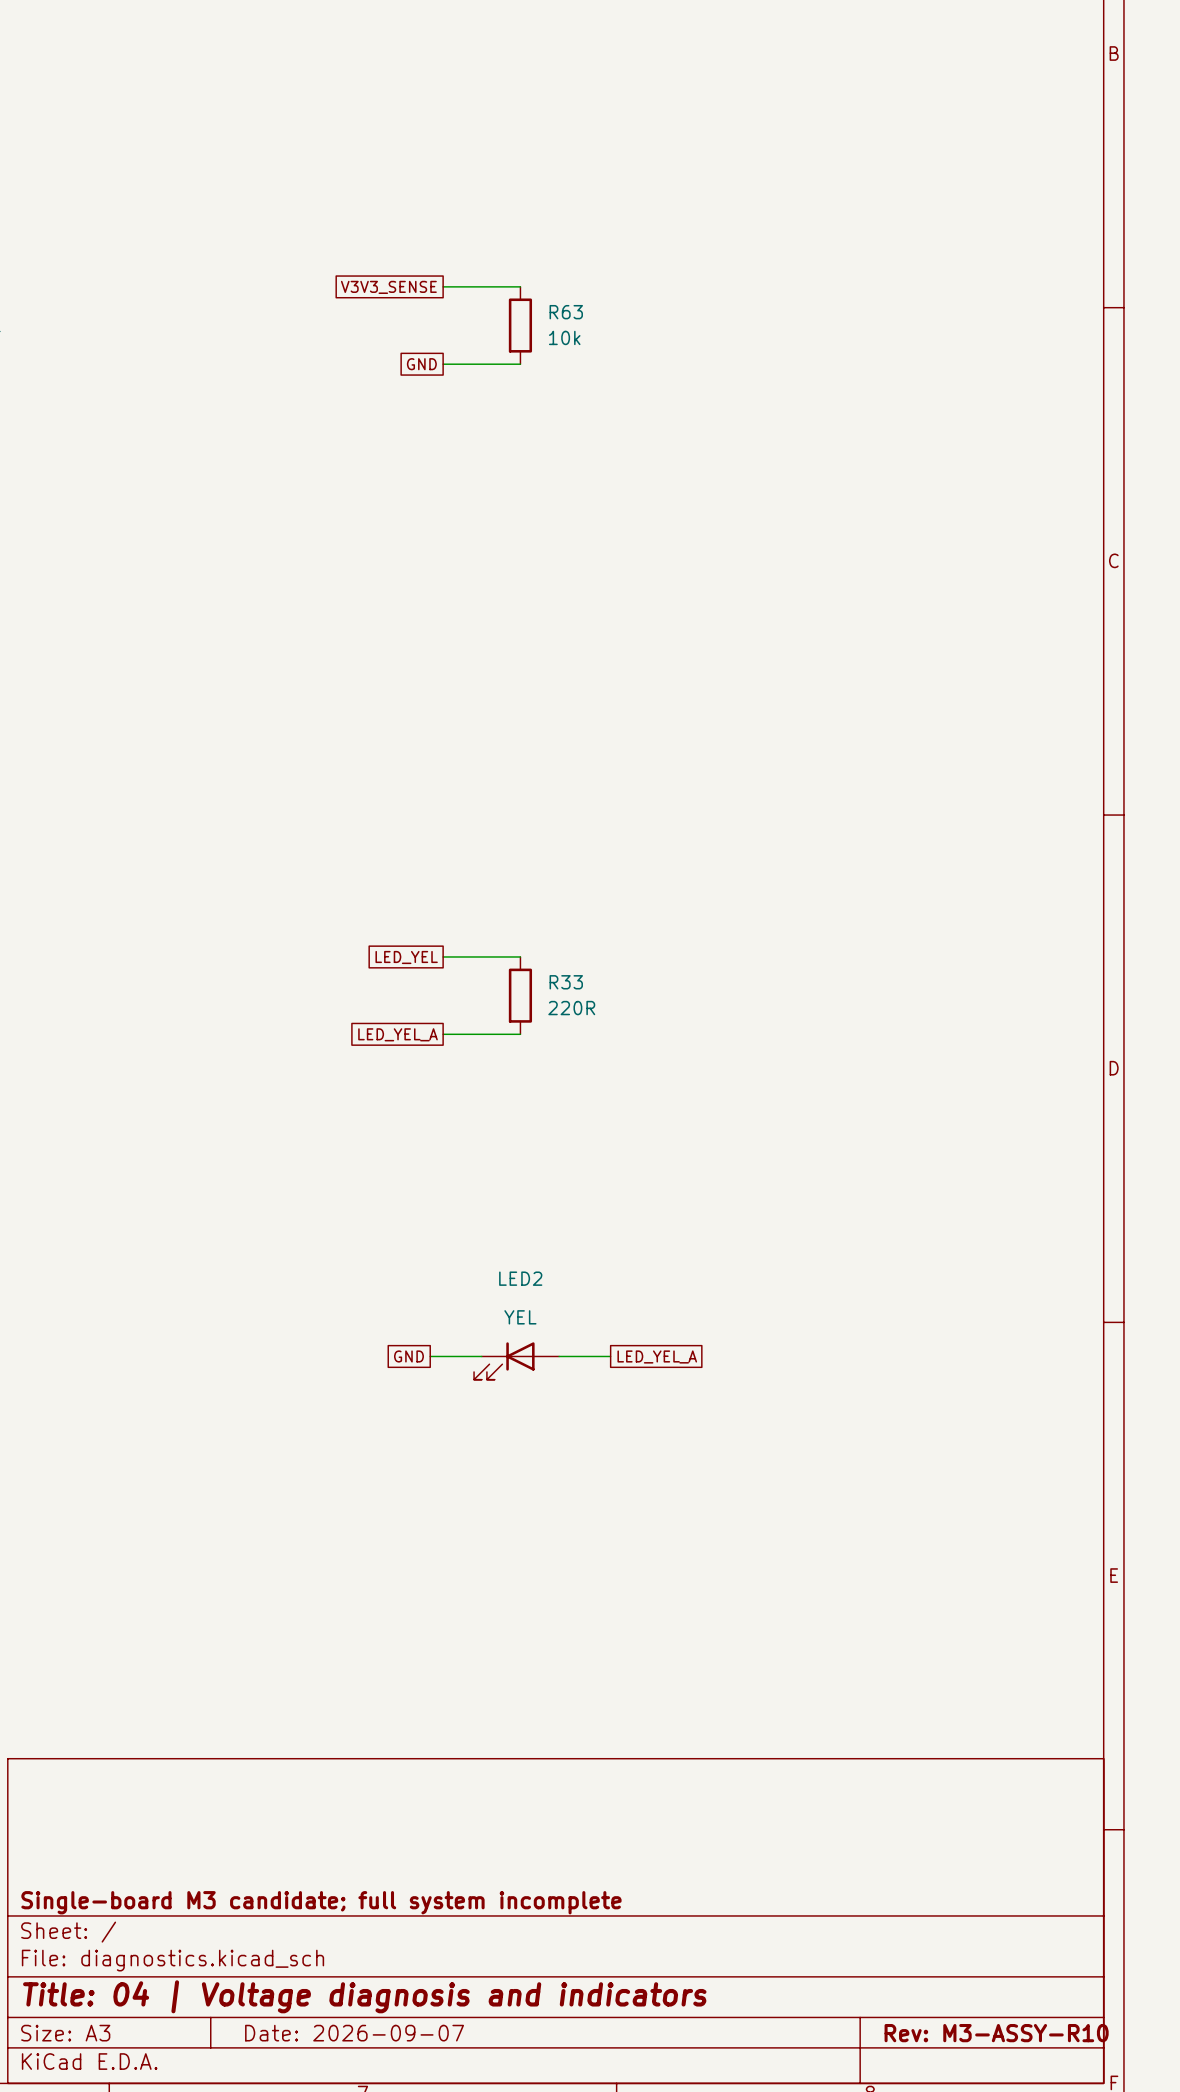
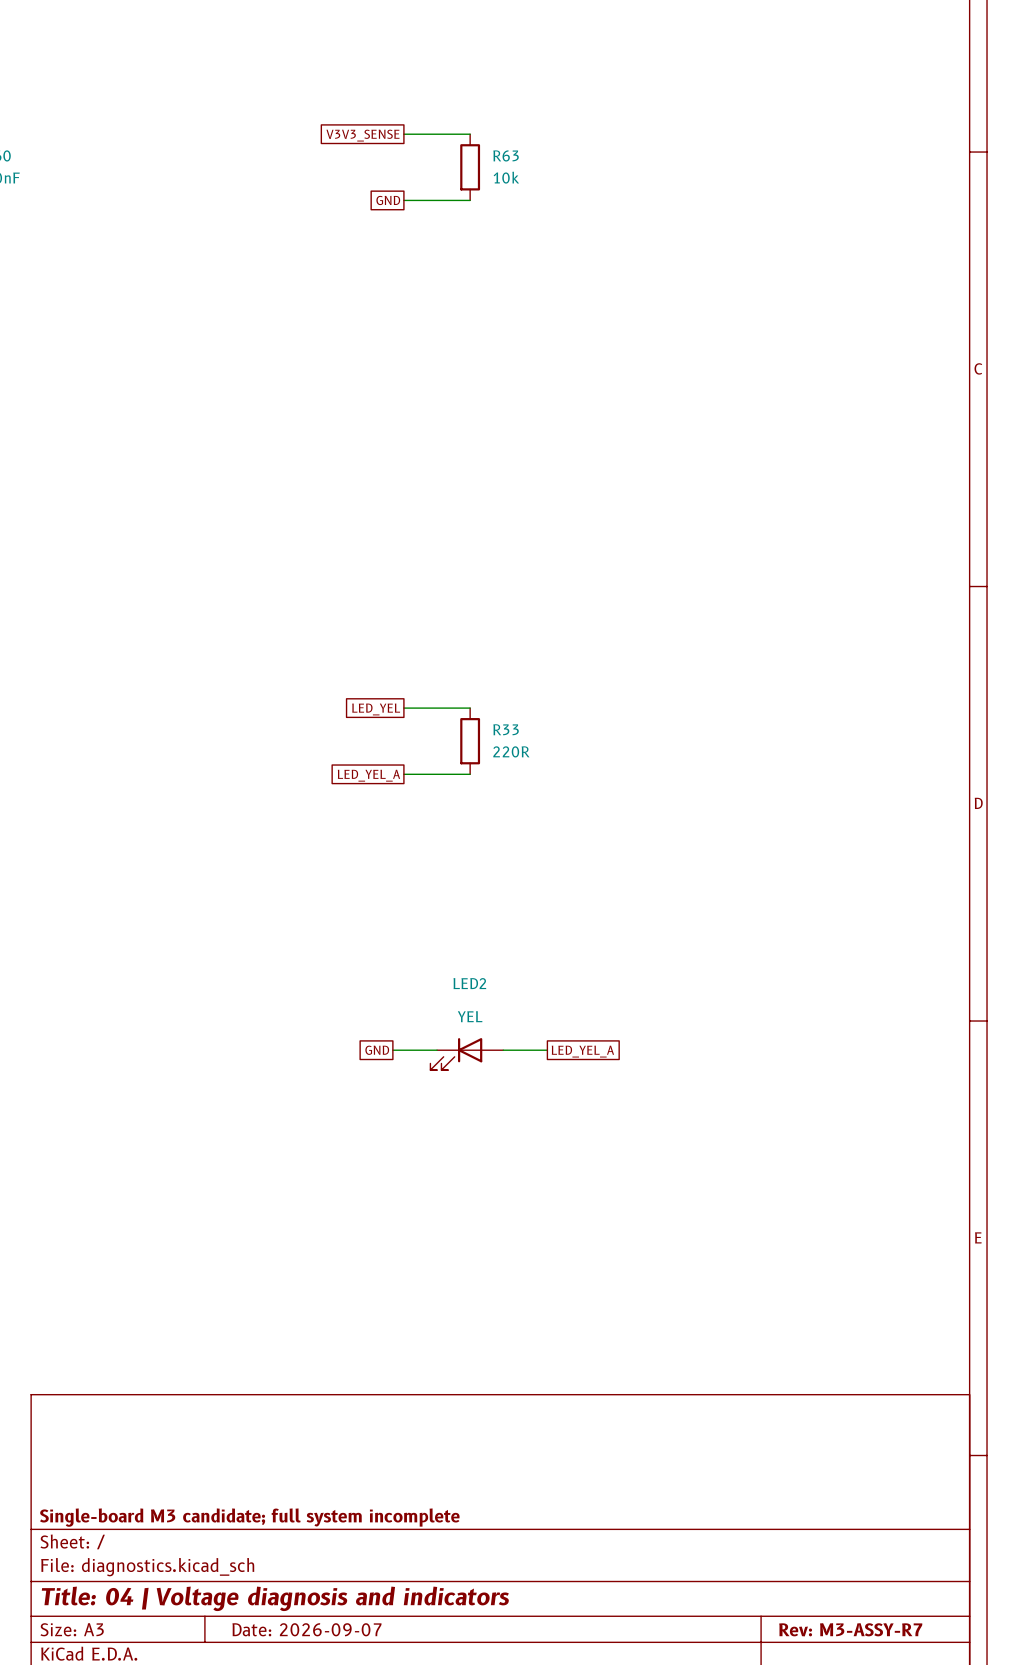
title block: Rev: M3-ASSY-R10 (996, 2033) -> Rev: M3-ASSY-R7 (850, 1629)

